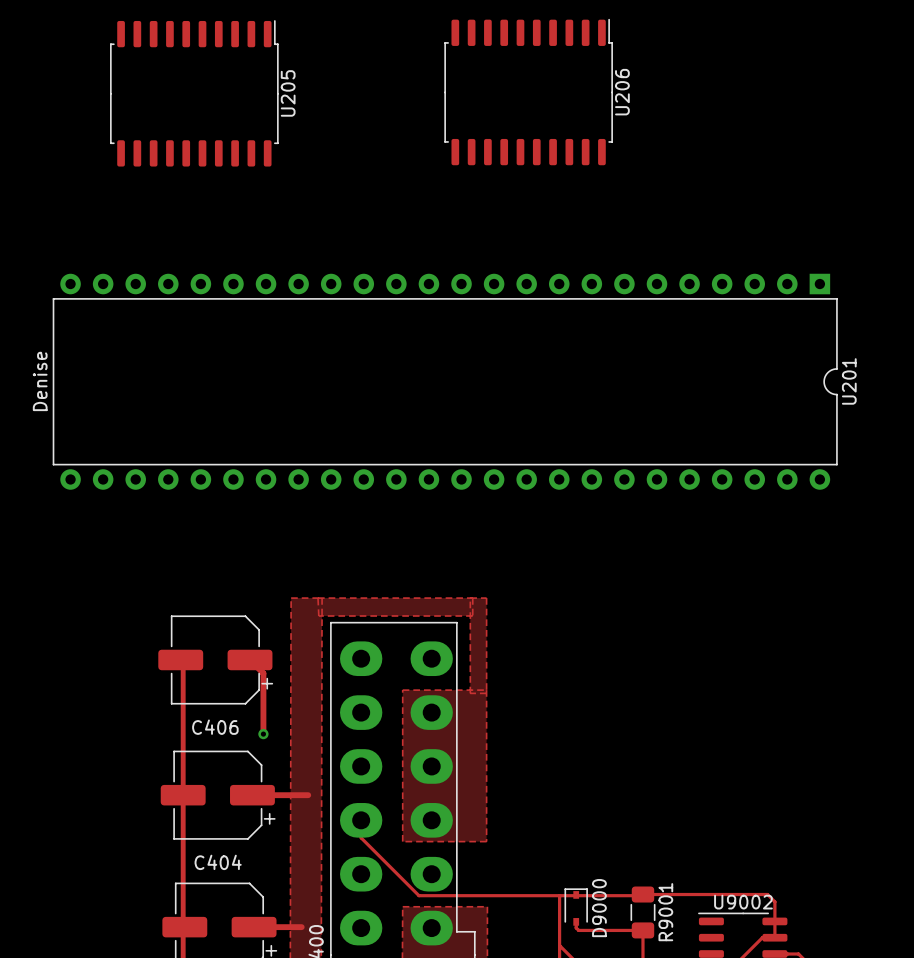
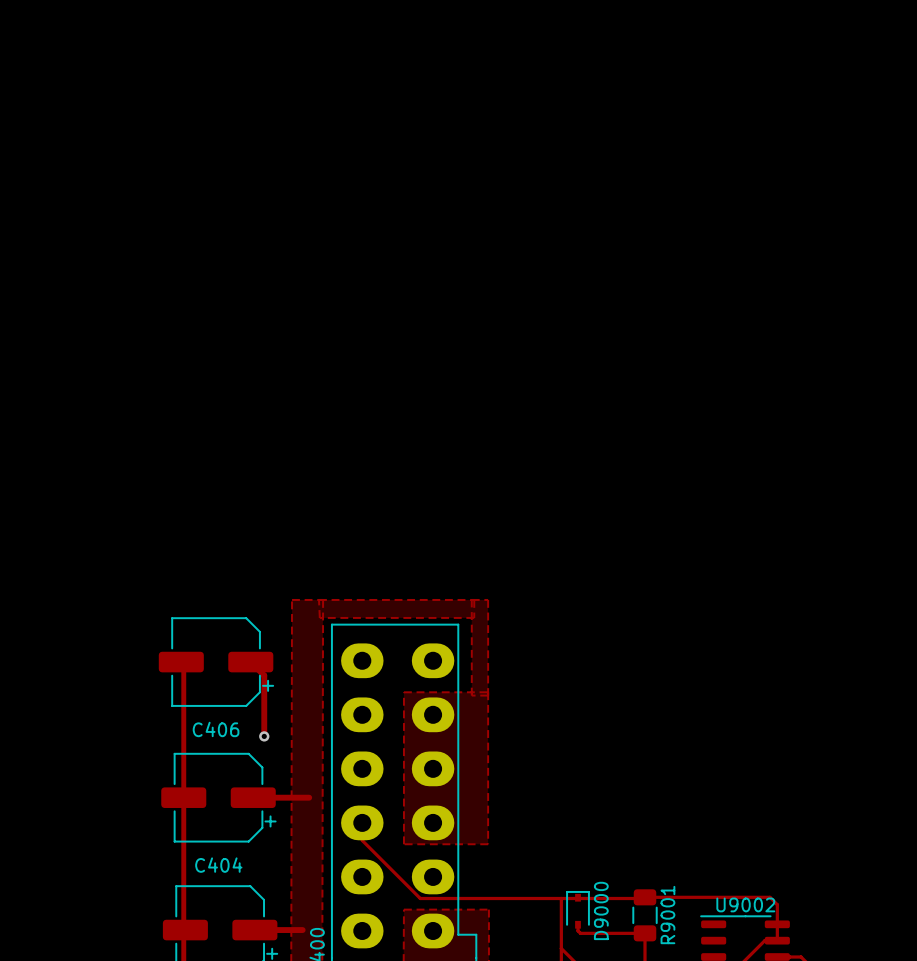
U206: (528, 92) -> none
U205: (194, 93) -> none
U201: Denise (445, 381) -> none

